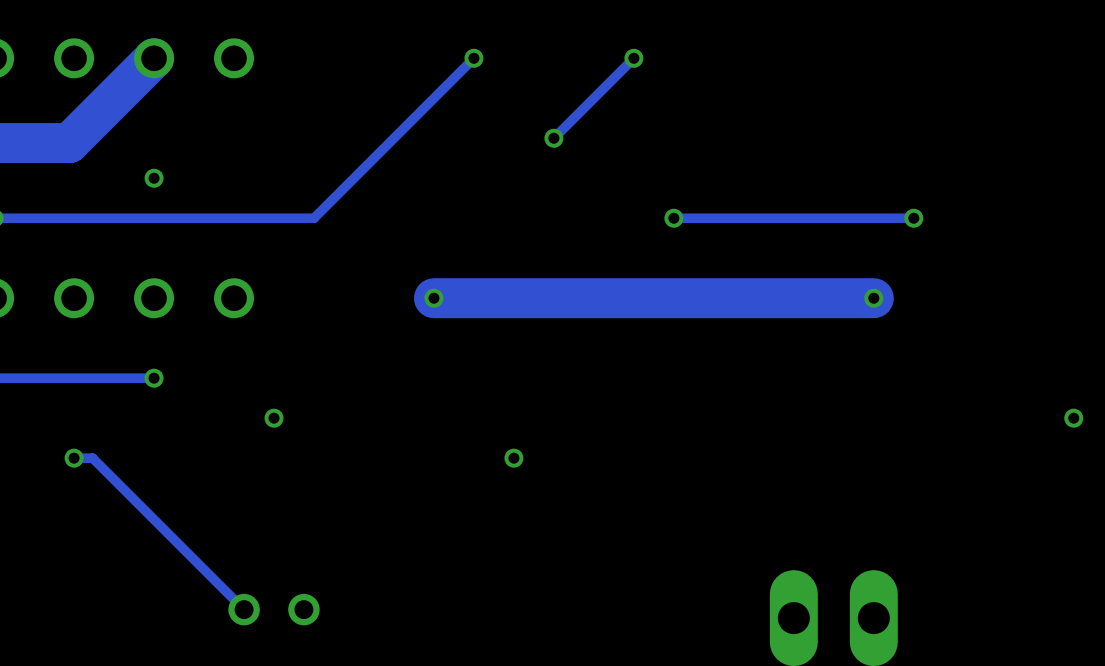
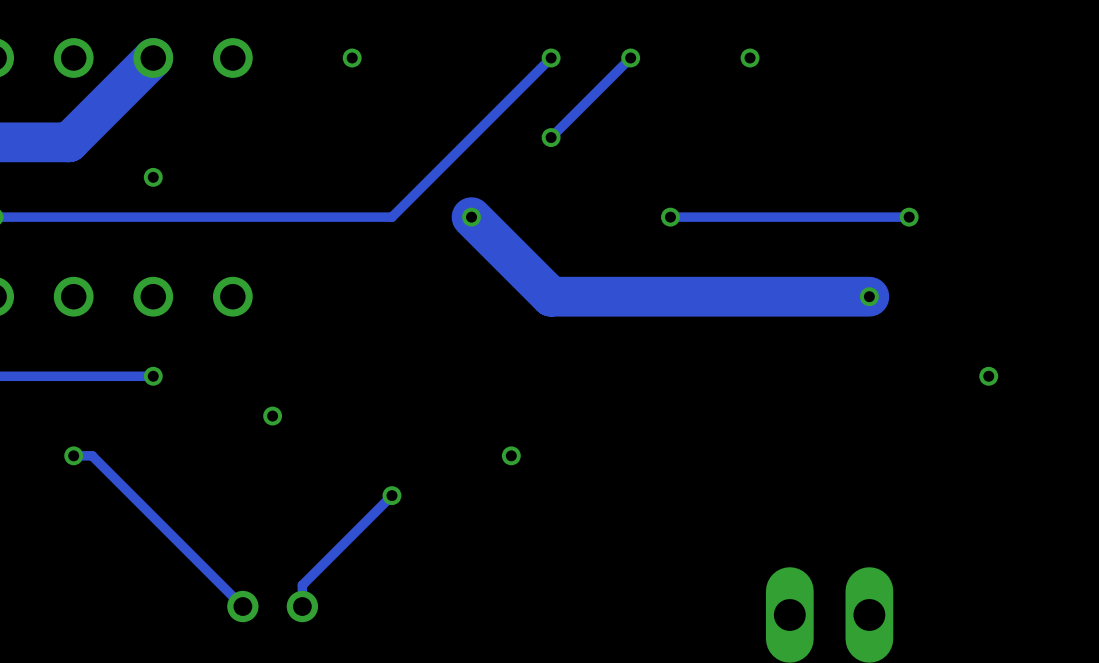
via: none -> (352, 57)
track: (473, 58) (314, 218) -> (551, 57) (391, 217) (312, 217)
via: (473, 58) -> none
via: none -> (551, 57)
via: none -> (750, 57)
via: none -> (471, 217)
via: (433, 298) -> none
track: (553, 298) (433, 298) -> (551, 296) (471, 217)
via position: (1073, 418) -> (988, 376)
track: none -> (391, 495) (302, 585) (302, 606)
via: none -> (391, 495)

